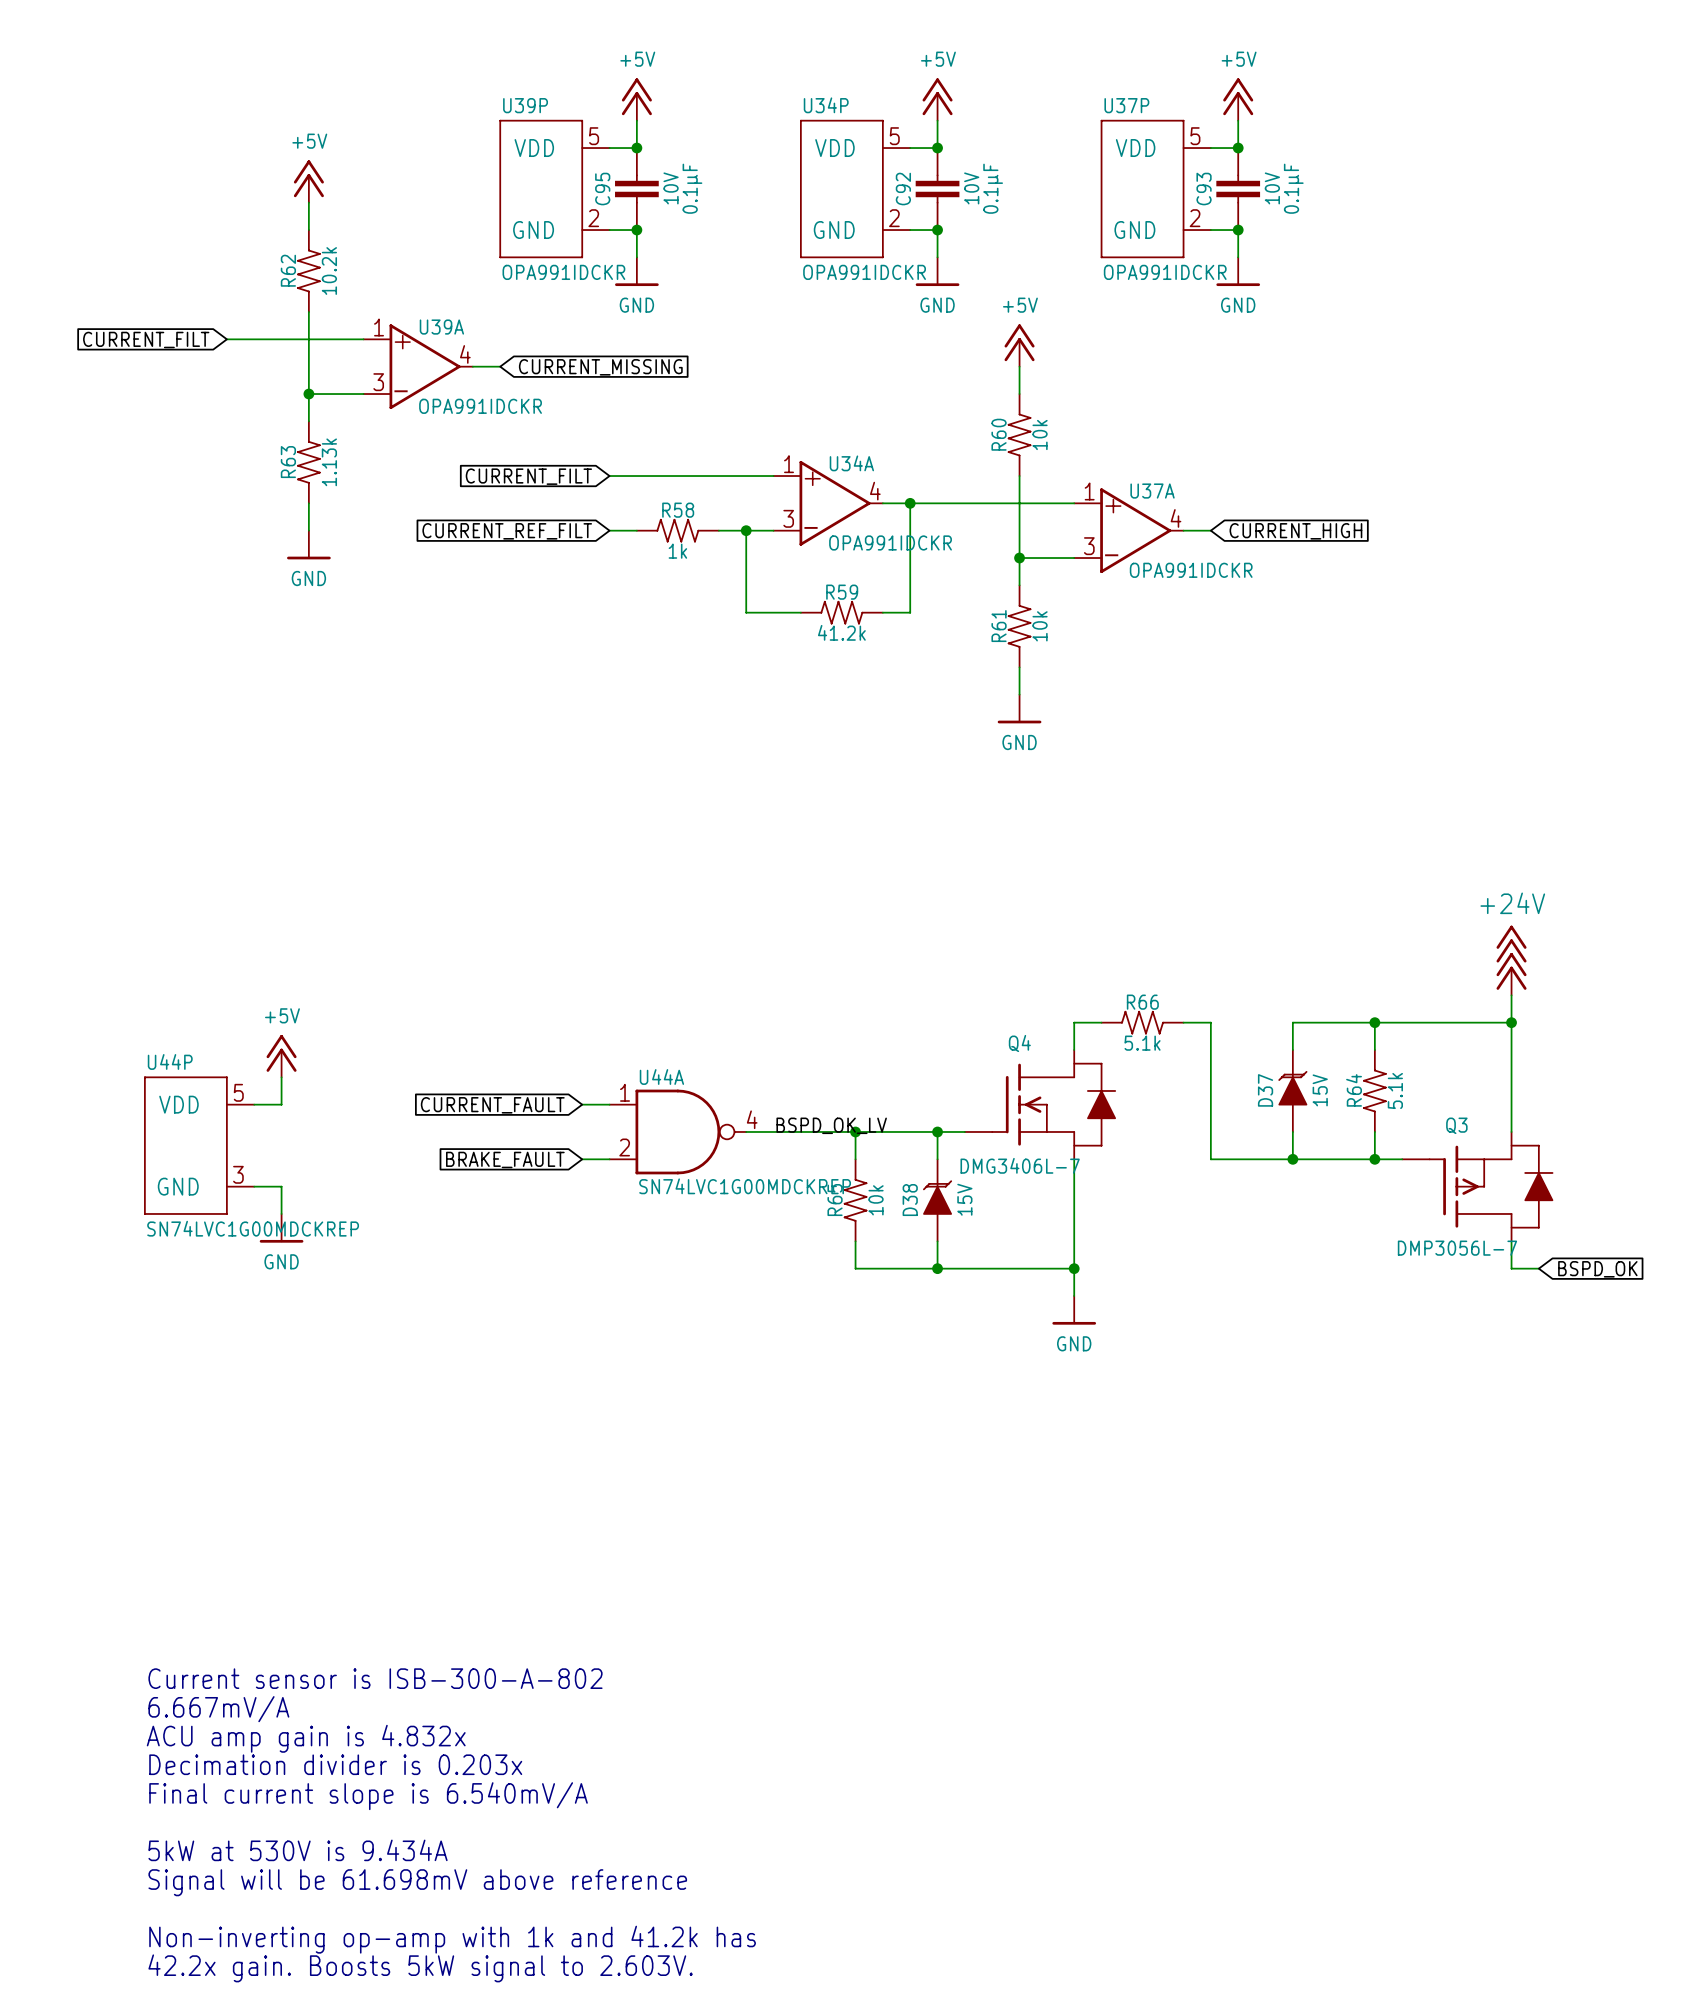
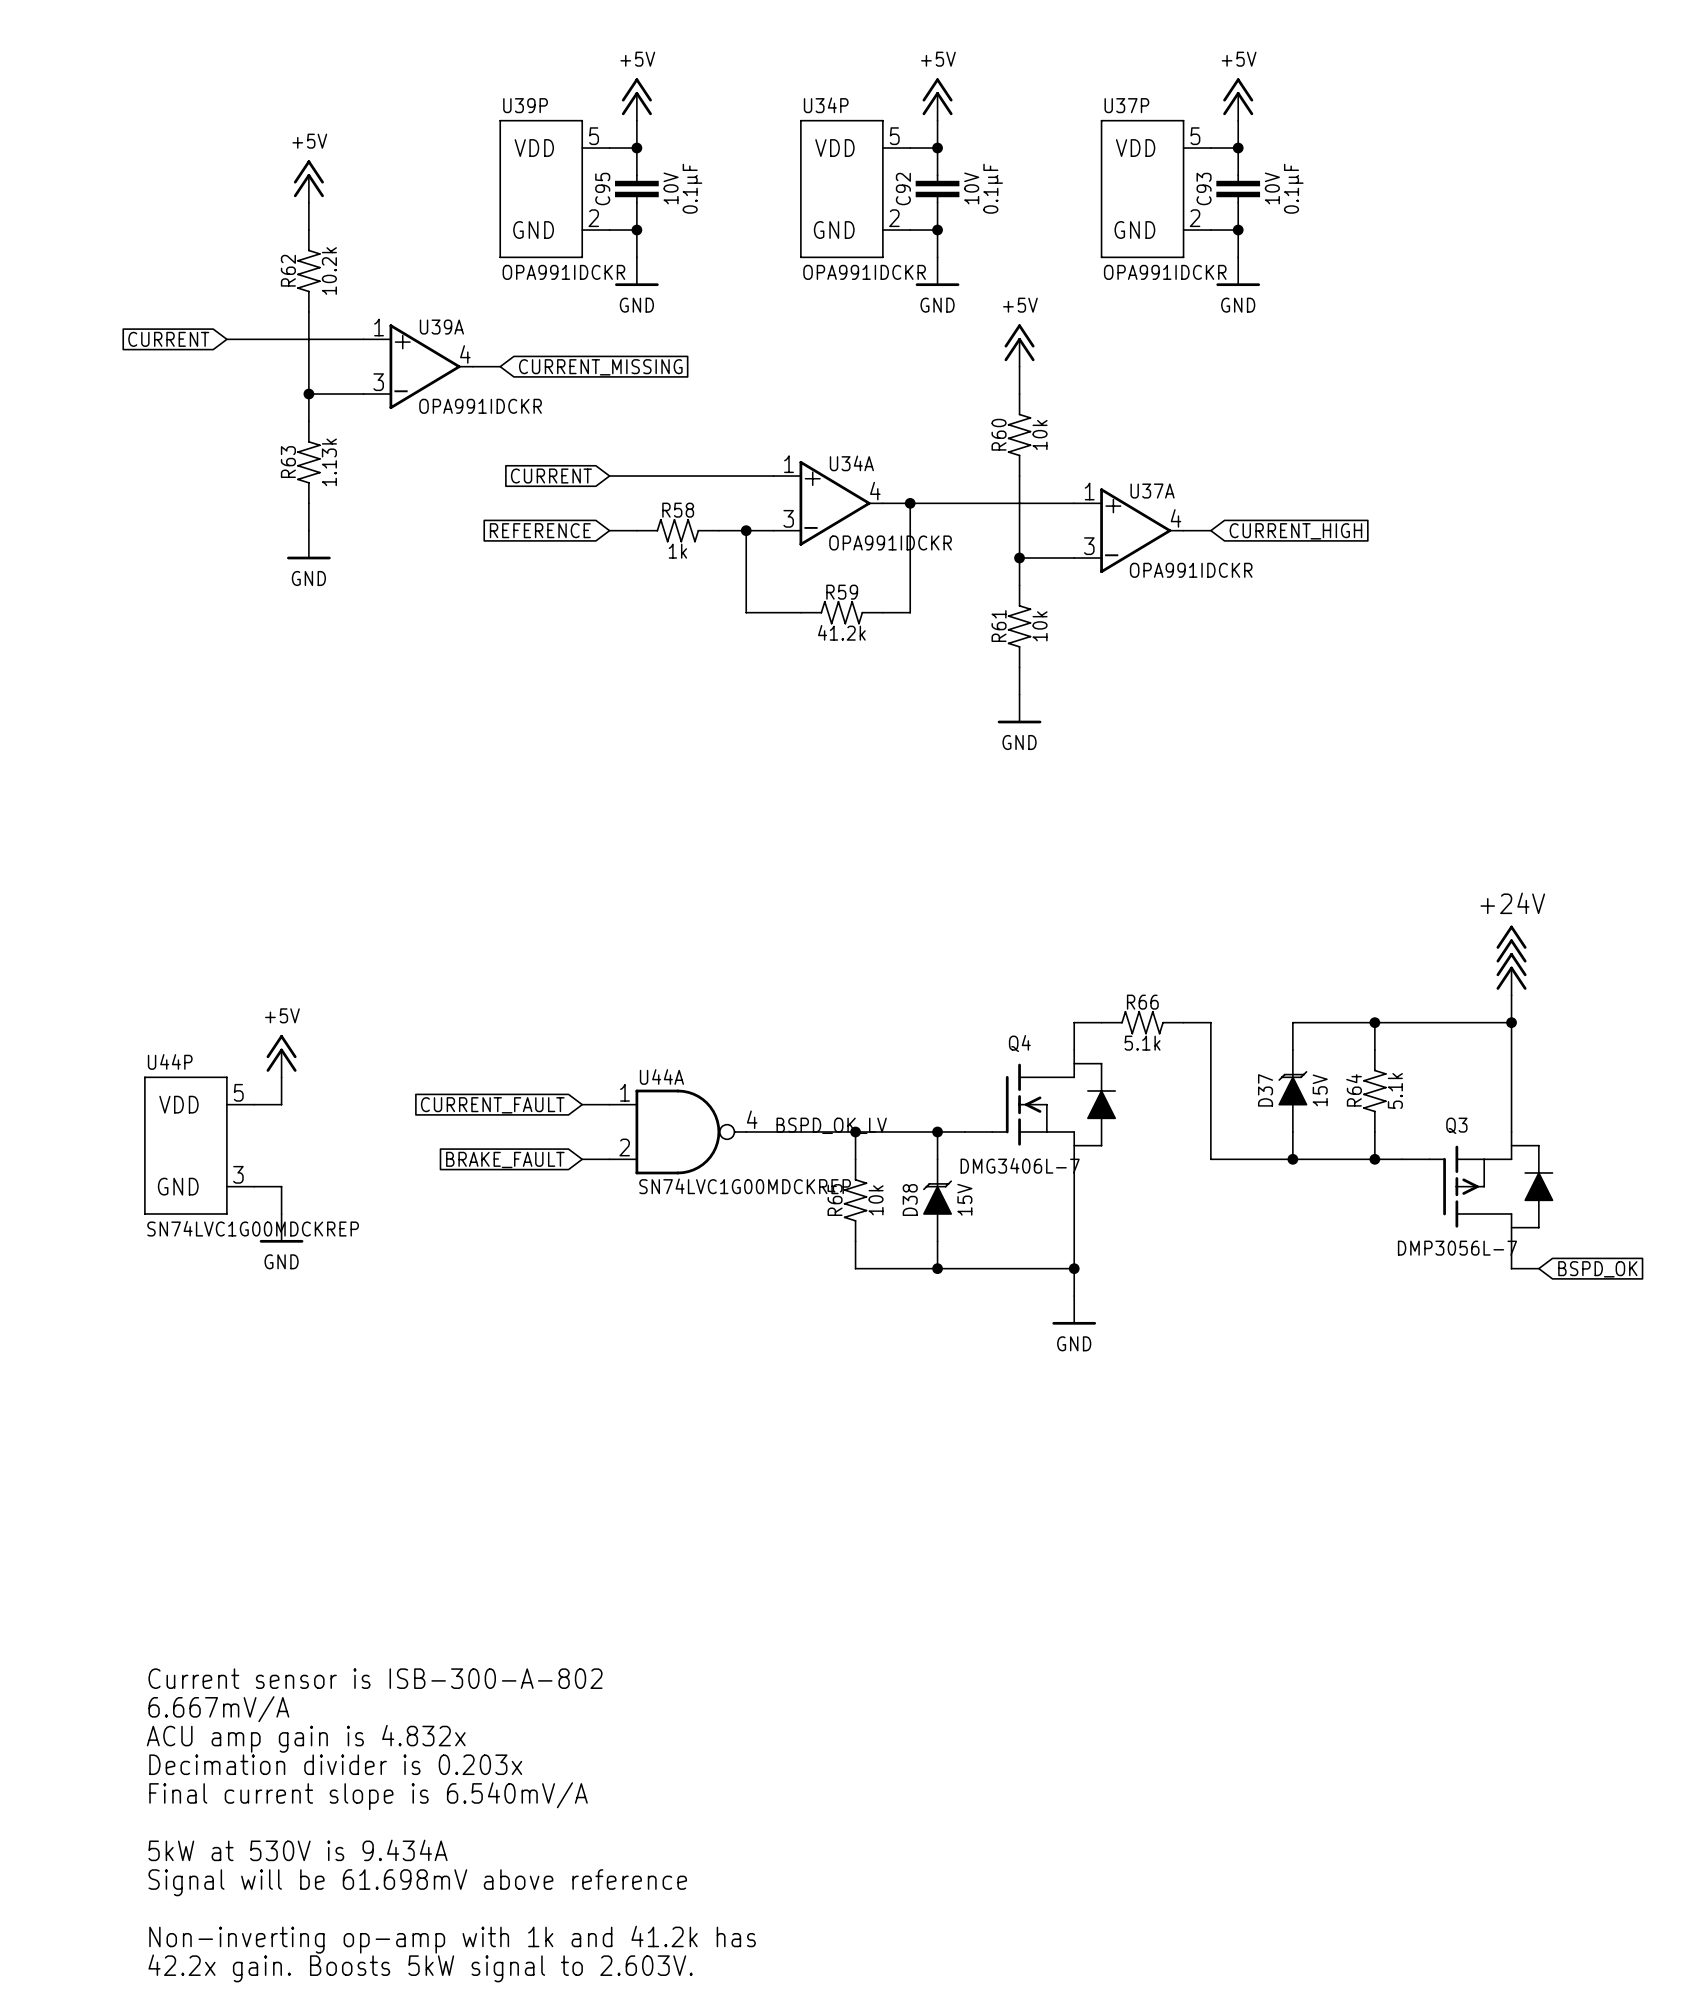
global label: CURRENT_FILT (146, 339) -> CURRENT (168, 339)
global label: CURRENT_FILT (528, 476) -> CURRENT (551, 476)
global label: CURRENT_REF_FILT (507, 531) -> REFERENCE (540, 530)

